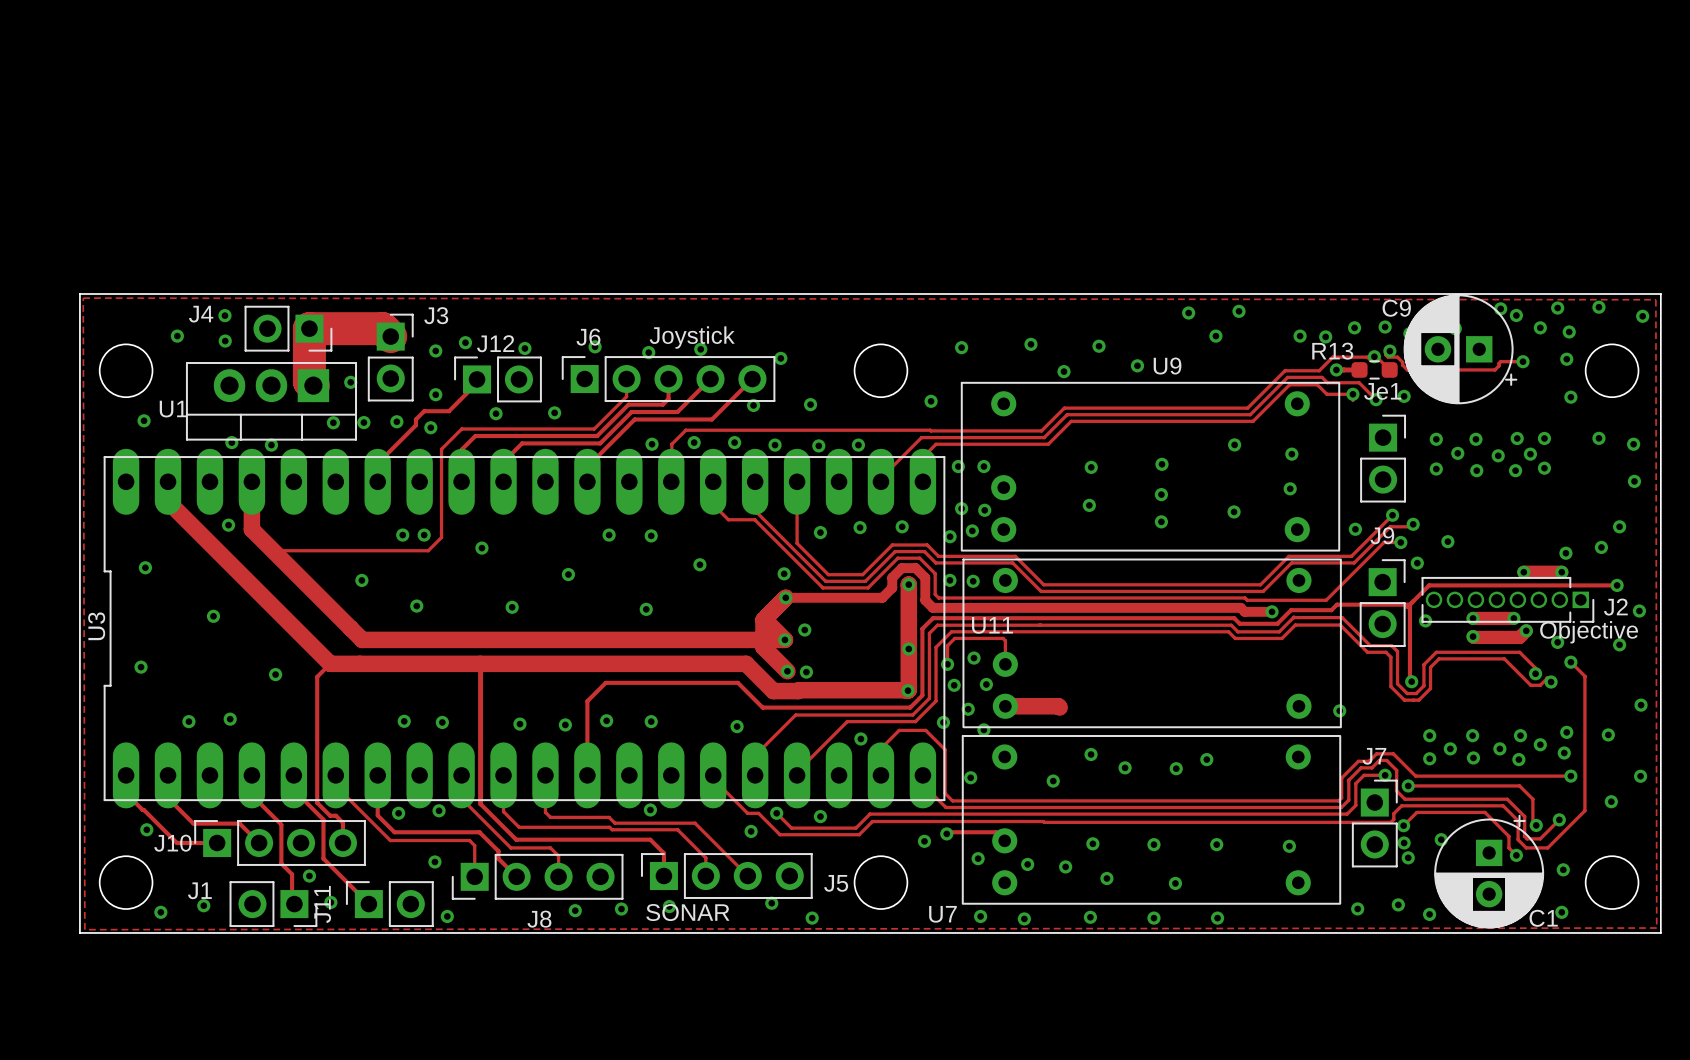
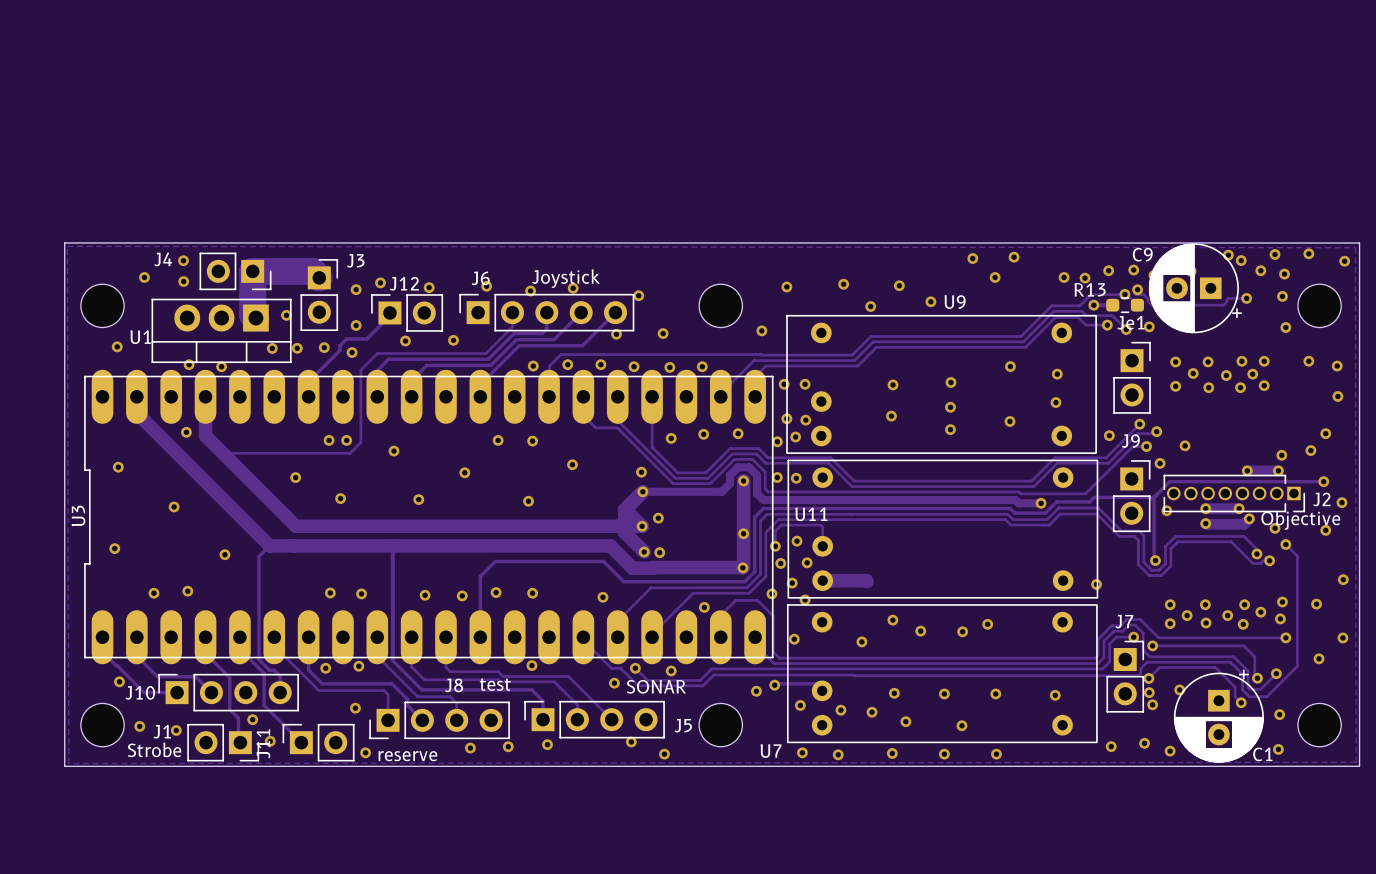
J8 value: none -> test (495, 684)
via: none -> (139, 726)
via: none -> (176, 730)
via: (203, 905) -> none
via: (160, 912) -> none
J5 value position: SONAR (687, 912) -> SONAR (656, 686)
J1 value: none -> Strobe (154, 749)
J8 name position: J8 (539, 919) -> J8 (454, 685)
J11 value: none -> reserve (407, 756)

